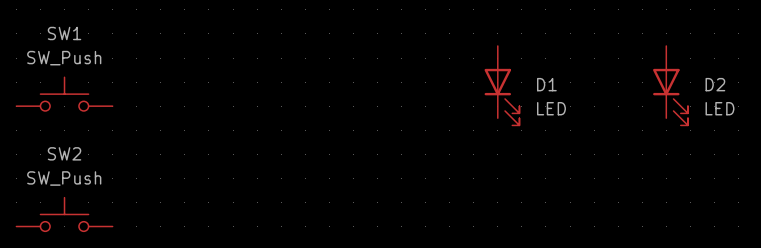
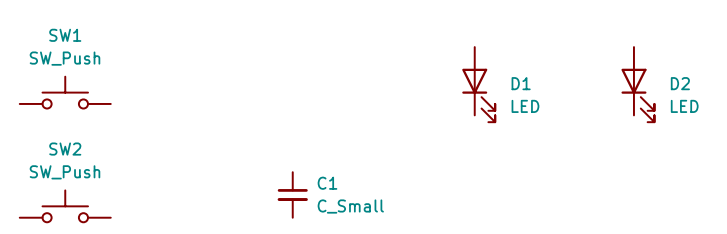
C1: none -> C_Small (292, 194)

